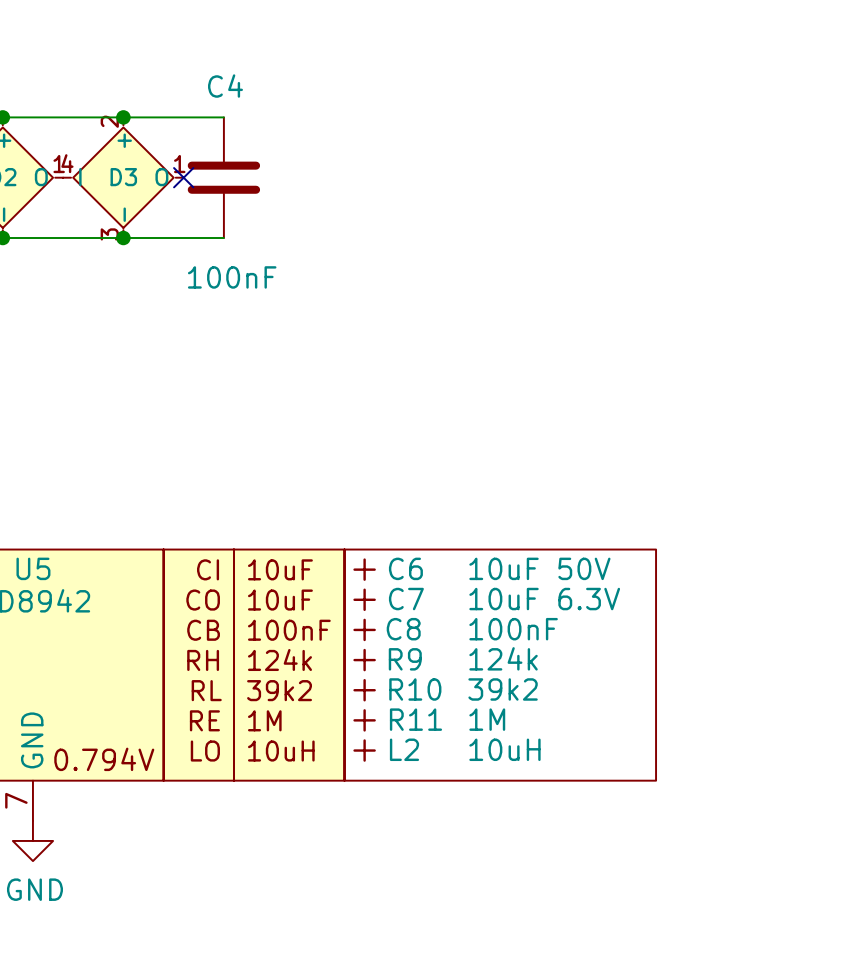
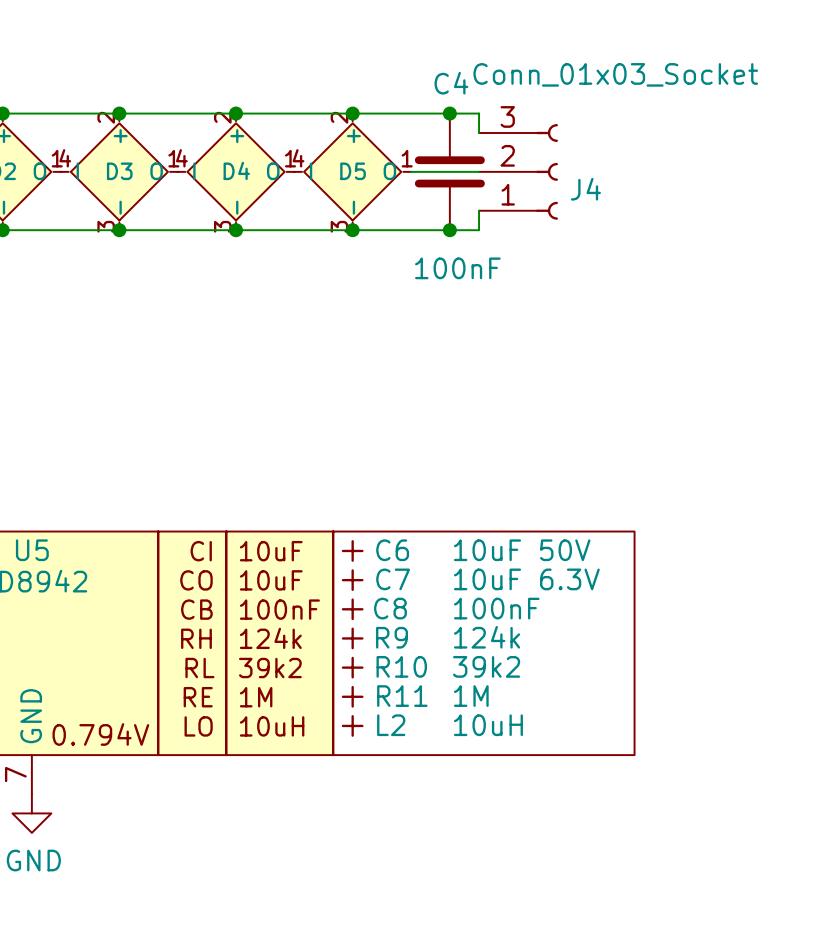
wire: none -> (216, 113) (479, 113) (479, 133)
junction: none -> (236, 113)
junction: none -> (352, 113)
junction: none -> (449, 113)
no-connect mark: (183, 177) -> none
C4 position: (223, 177) -> (449, 171)
D4: none -> (236, 171)
D5: none -> (352, 171)
wire: none -> (410, 171) (479, 171)
J4: none -> Conn_01x03_Socket (518, 171)
wire: none -> (479, 210) (479, 230) (216, 230)
junction: none -> (236, 230)
junction: none -> (352, 230)
junction: none -> (449, 230)

